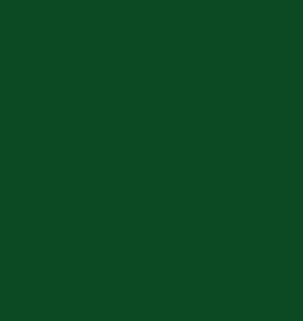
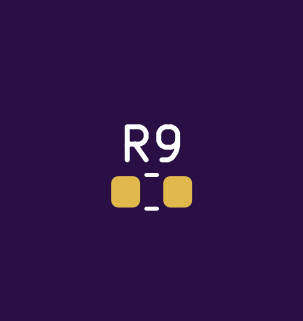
R9: none -> (151, 191)

